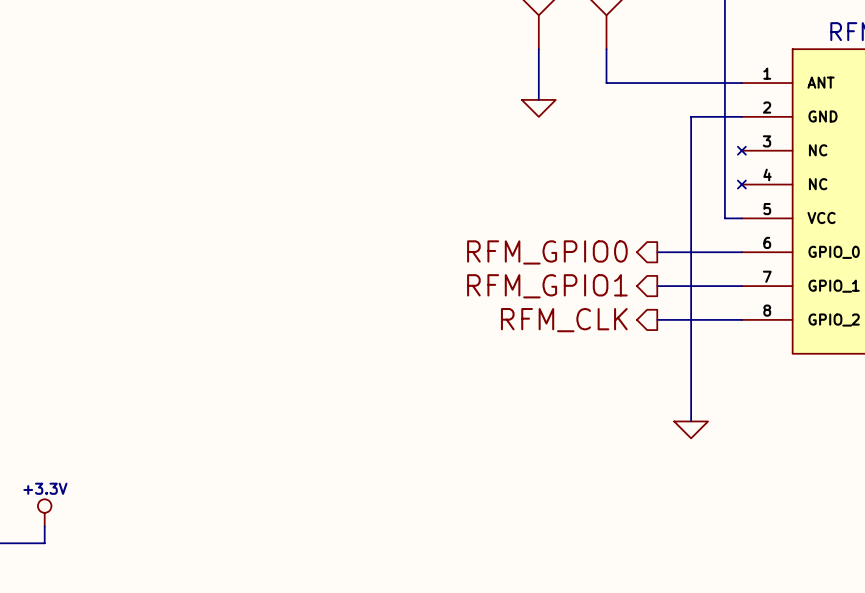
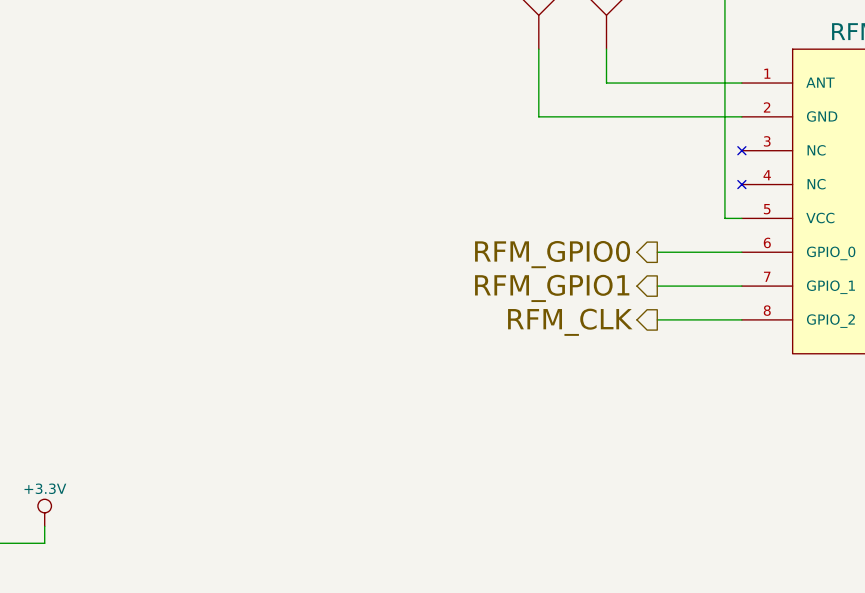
power symbol: (538, 108) -> none
wire: (691, 116) (691, 421) -> (691, 116) (538, 116) (538, 99)
power symbol: (691, 429) -> none

